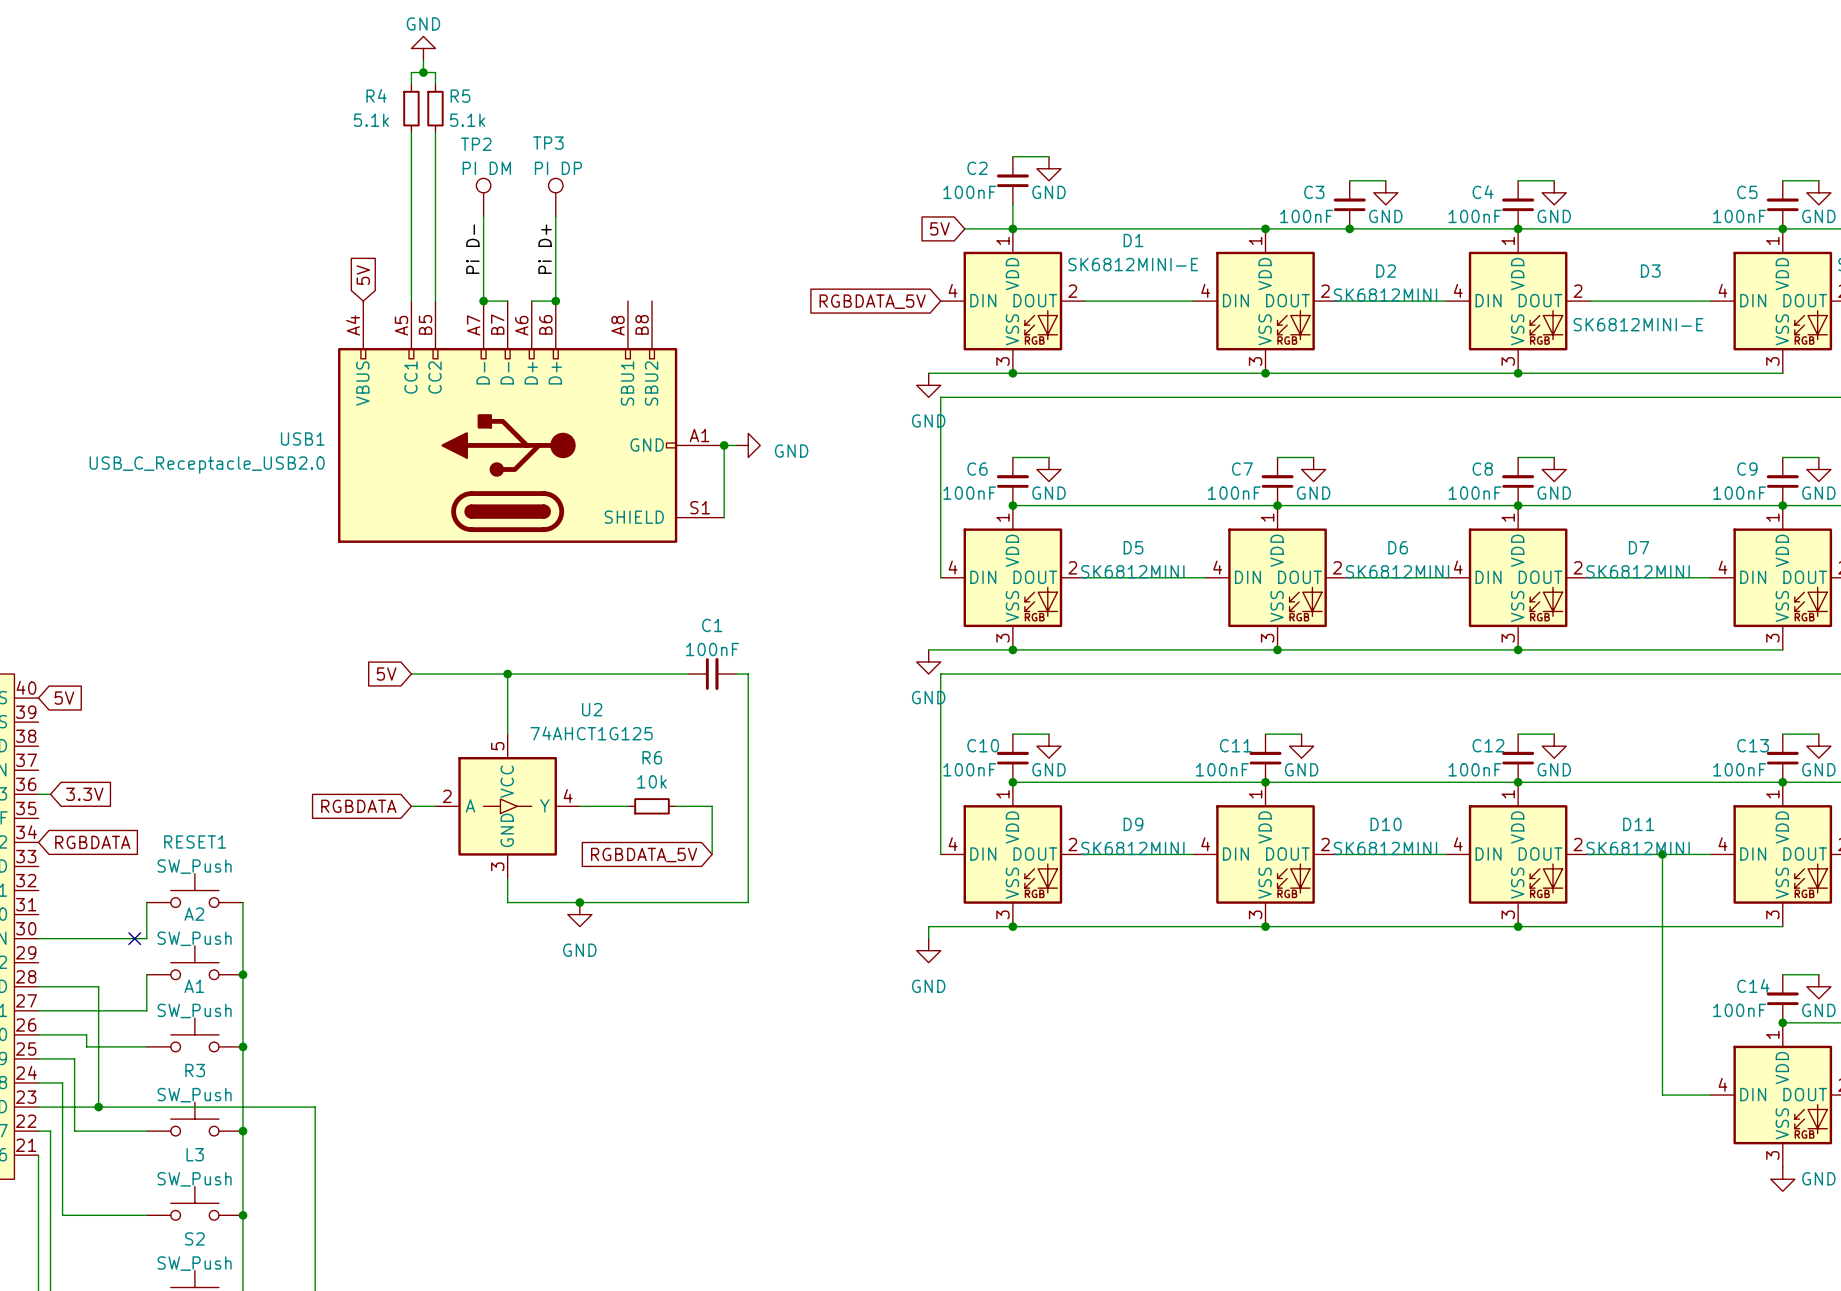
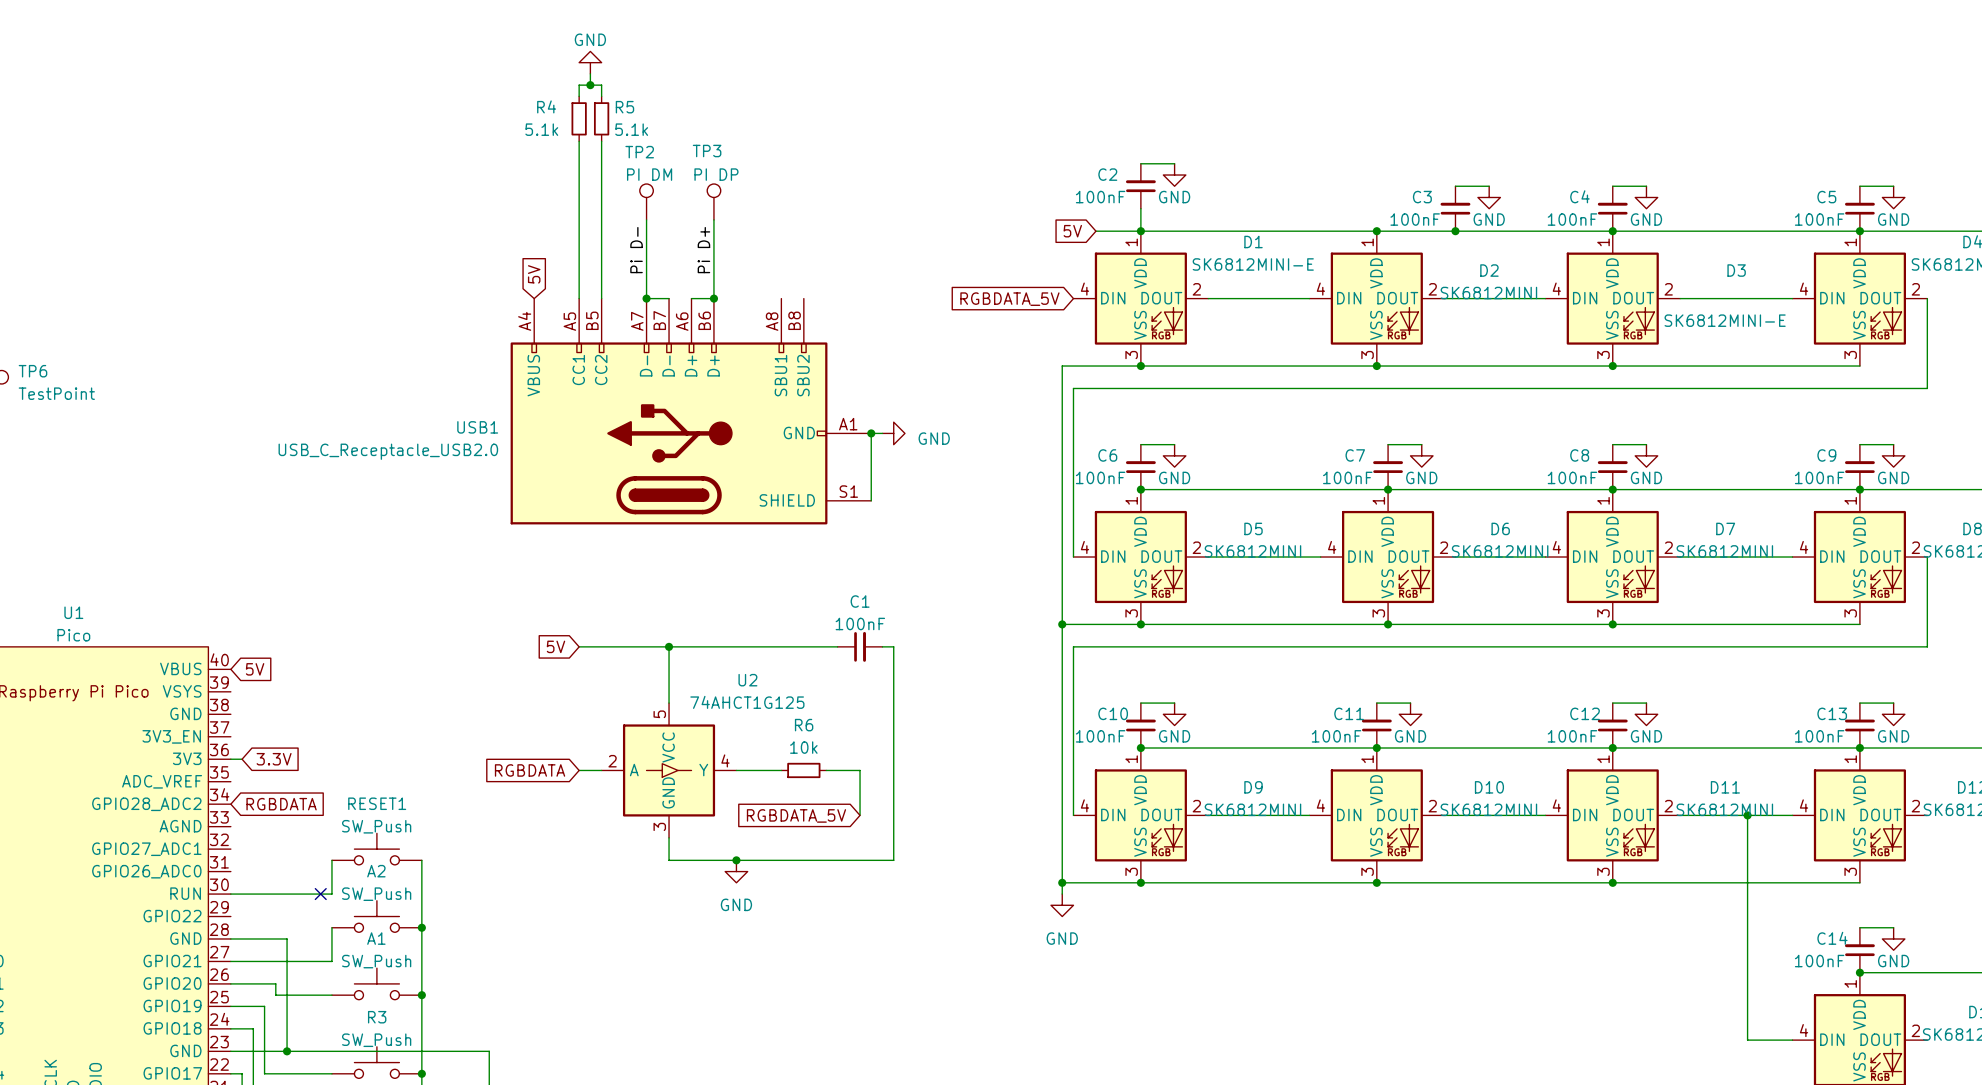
wire: none -> (1062, 366) (1062, 882)
power symbol: GND (928, 385) -> none
junction: none -> (1062, 624)
power symbol: GND (928, 661) -> none
junction: none -> (1062, 882)

